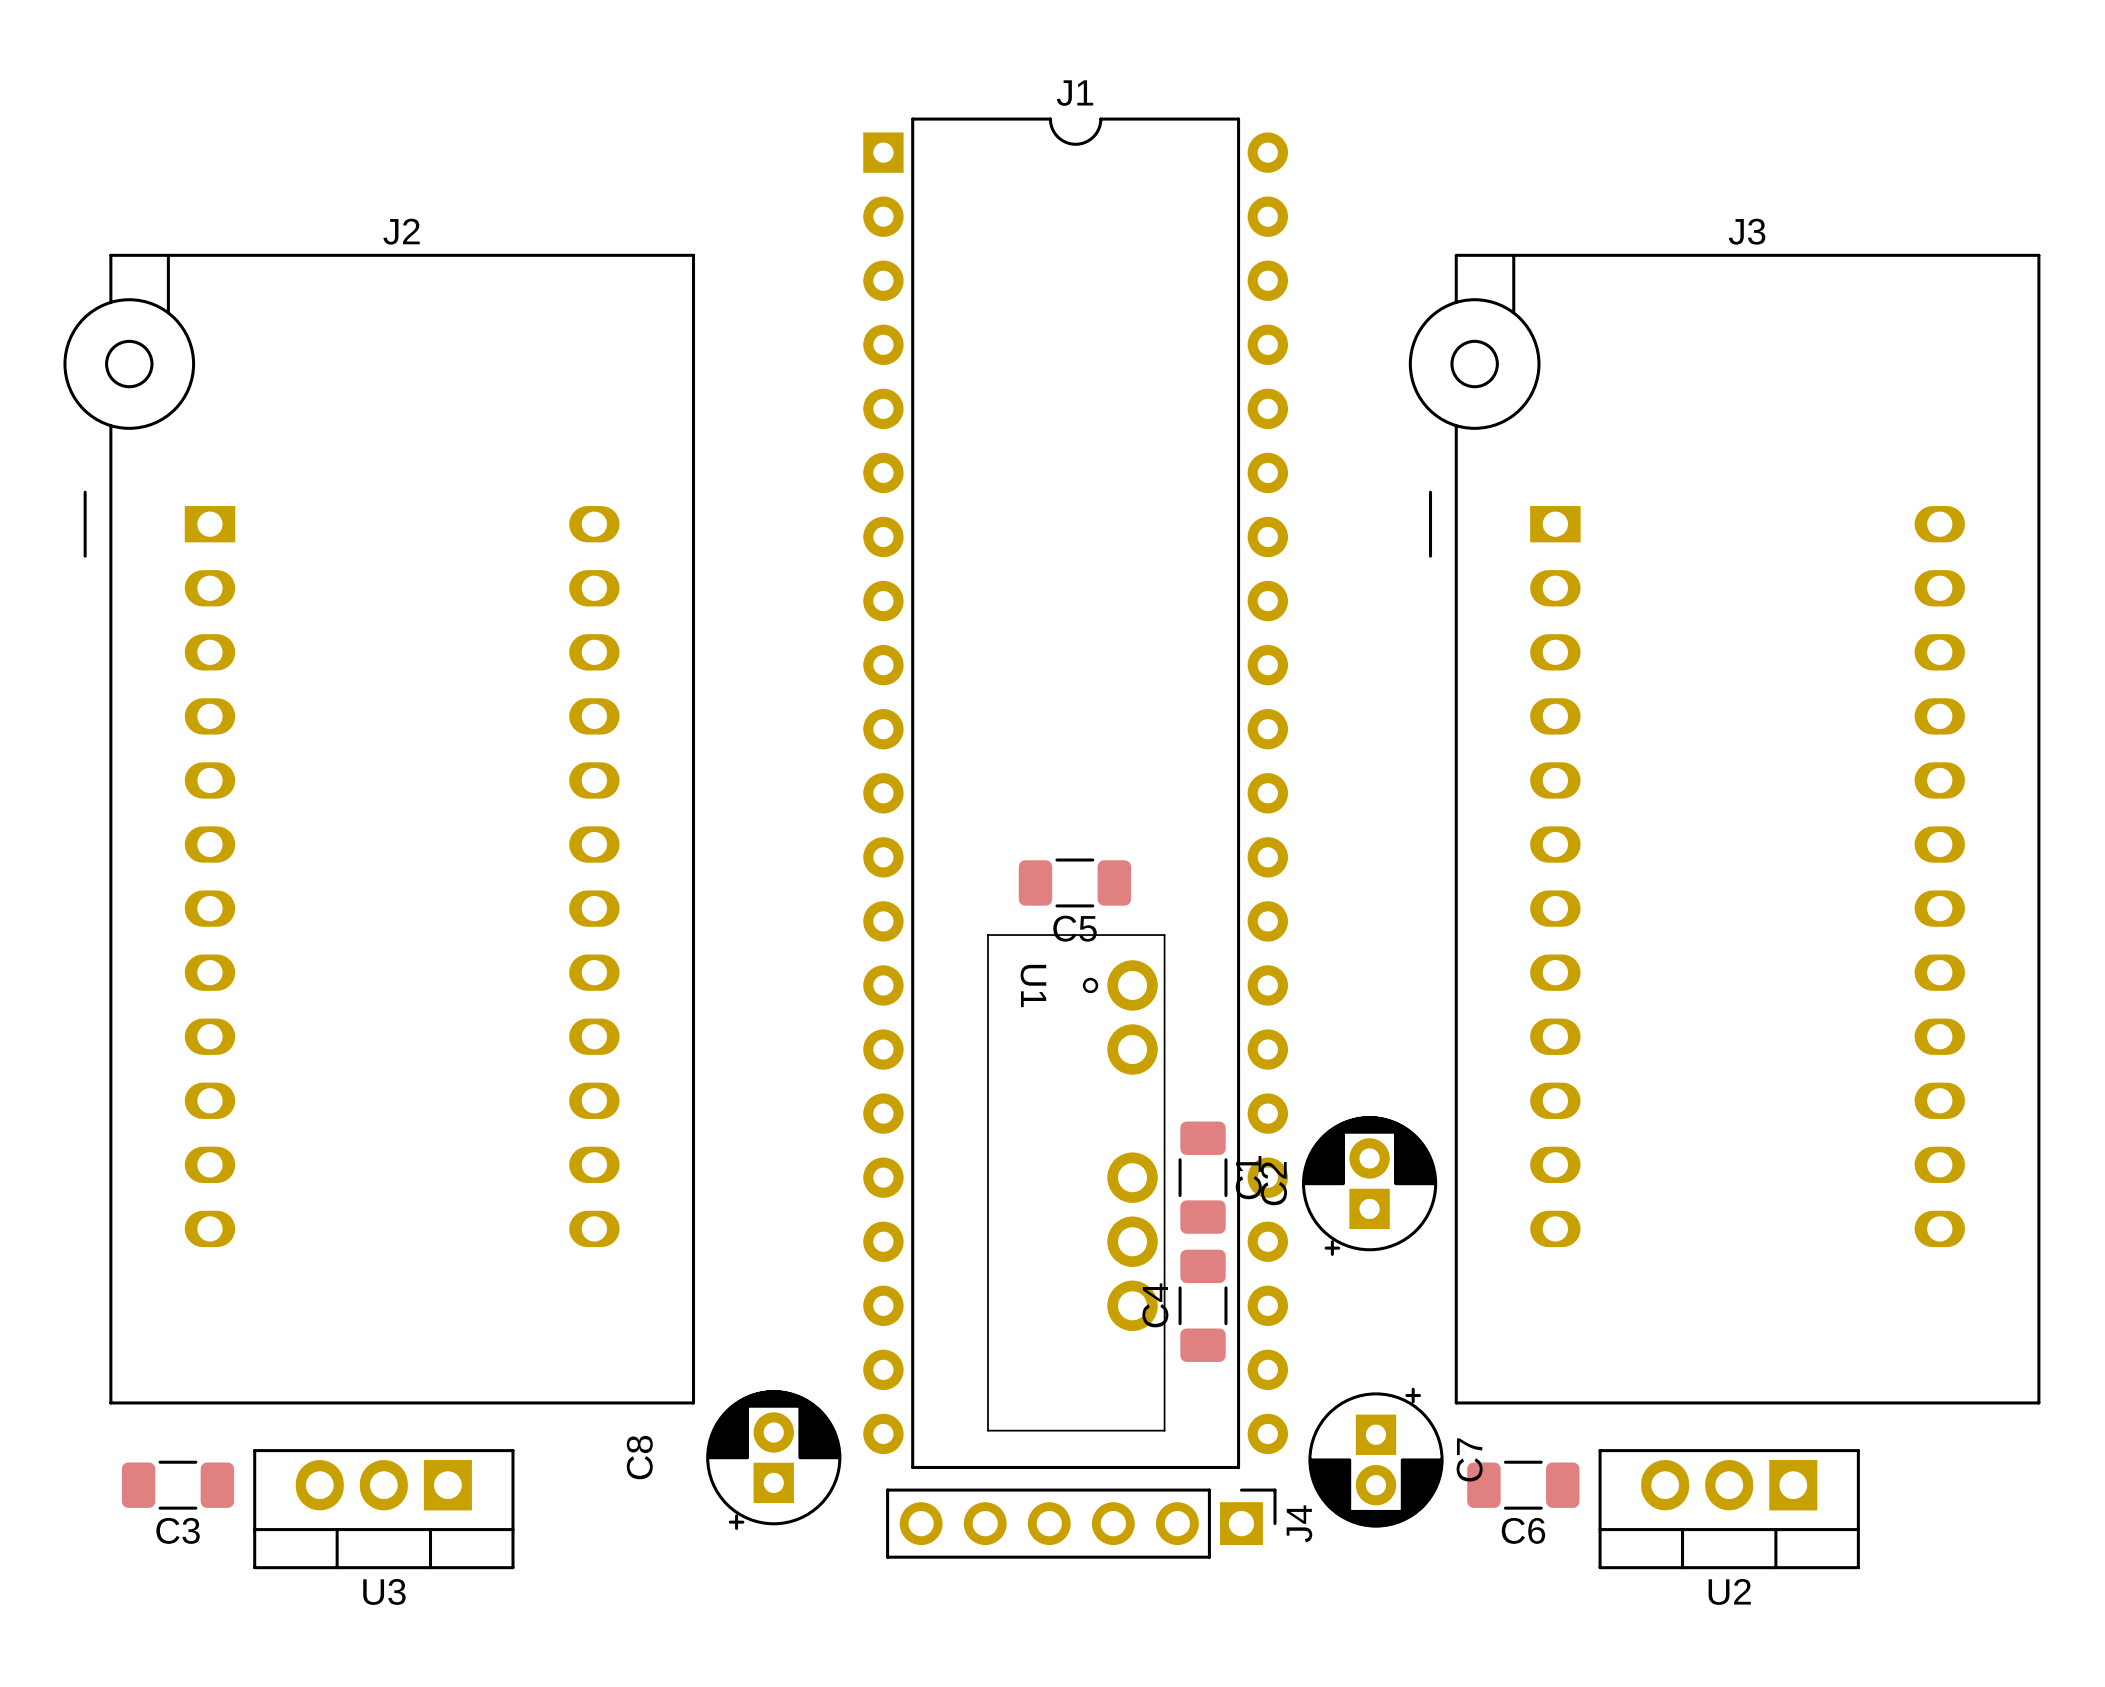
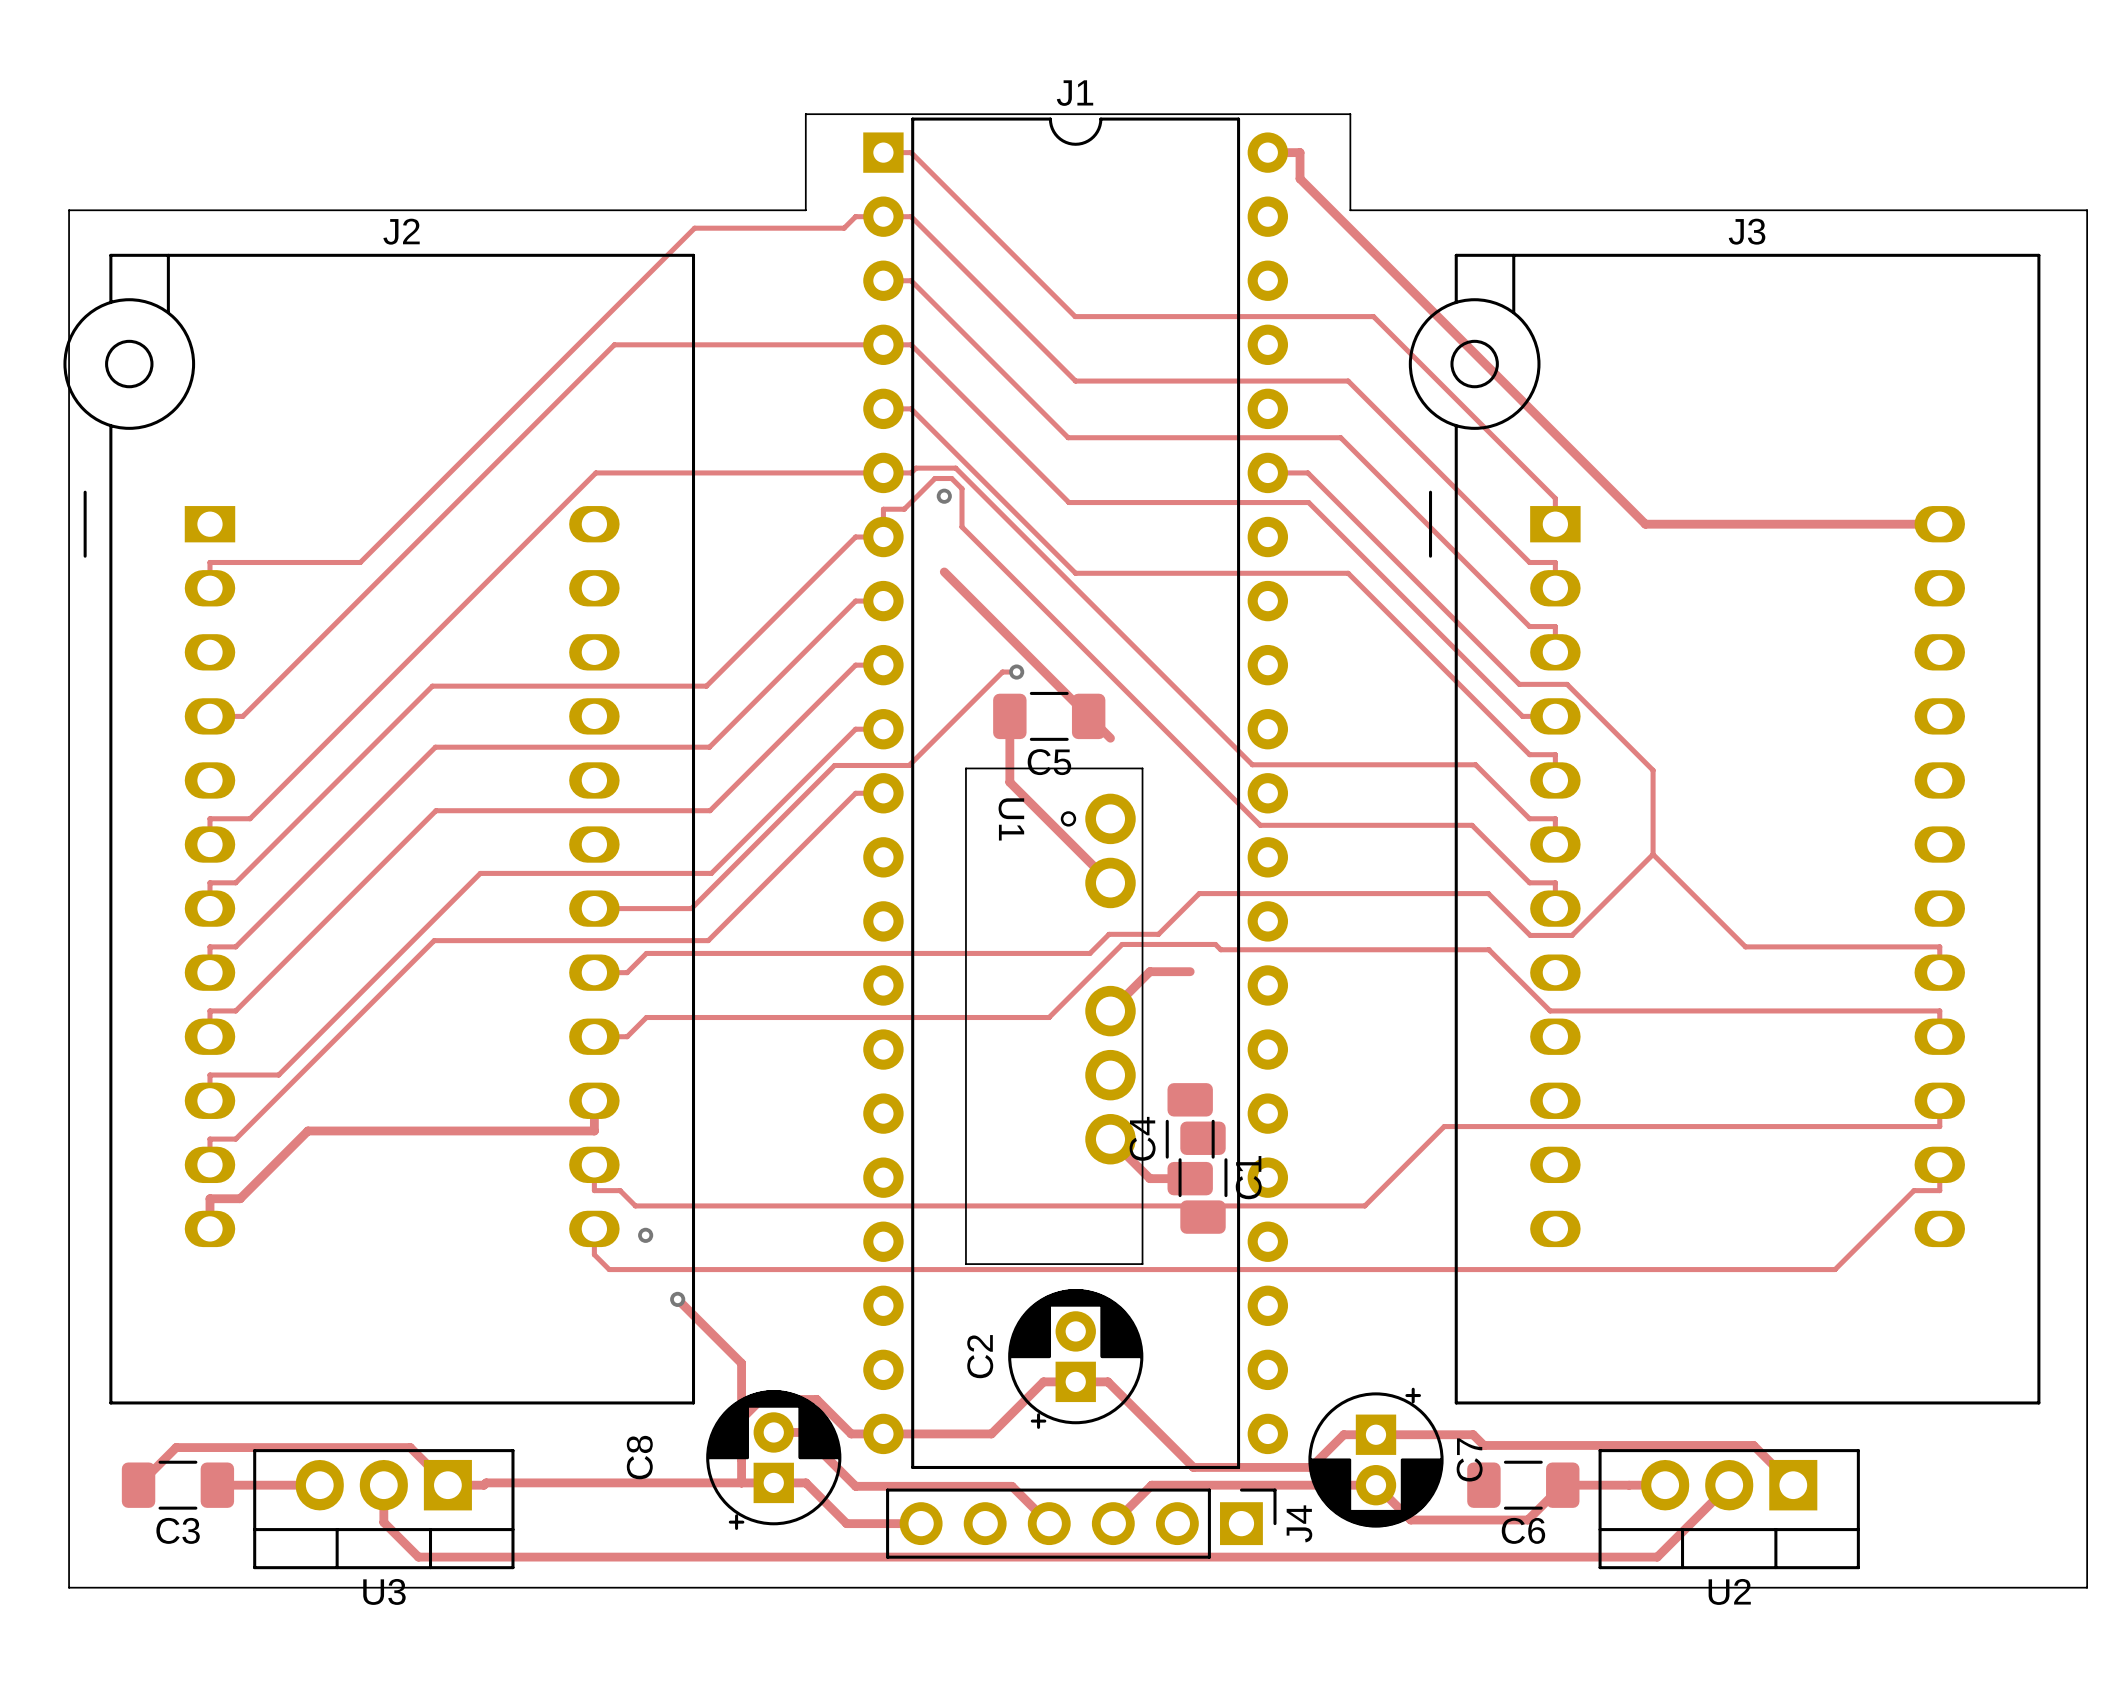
board edge: none -> (805, 114) (1350, 114) (1350, 210) (2087, 210) (2087, 1587) (69, 1587) (69, 210) (805, 210) (805, 114)
track: none -> (883, 152) (911, 152) (1075, 316) (1373, 316) (1555, 498) (1555, 524)
track: none -> (1267, 152) (1300, 152) (1300, 178) (1645, 524) (1939, 524)
track: none -> (883, 280) (911, 280) (1068, 437) (1340, 437) (1529, 626) (1555, 626) (1555, 652)
track: none -> (883, 408) (911, 408) (1075, 573) (1348, 573) (1529, 754) (1555, 754) (1555, 780)
track: none -> (1267, 472) (1307, 472) (1519, 684) (1567, 684) (1653, 770) (1653, 854)
via: none -> (944, 496)
track: none -> (944, 571) (1110, 738)
track: none -> (209, 588) (209, 562) (360, 562) (694, 228) (844, 228) (855, 216) (911, 216) (1075, 381) (1348, 381) (1529, 562) (1555, 562) (1555, 588)
track: none -> (883, 601) (855, 601) (709, 747) (435, 747) (235, 946) (209, 946) (209, 972)
track: none -> (883, 665) (855, 665) (710, 810) (436, 810) (235, 1010) (209, 1010) (209, 1036)
track: none -> (1016, 672) (1002, 672) (909, 765) (834, 765) (691, 908) (594, 908)
via: none -> (1016, 672)
track: none -> (209, 716) (242, 716) (614, 344) (911, 344) (1068, 502) (1308, 502) (1522, 716) (1555, 716)
track: none -> (1009, 716) (1009, 782) (1110, 882)
track: none -> (883, 729) (855, 729) (711, 873) (480, 873) (278, 1075) (209, 1075) (209, 1100)
track: none -> (883, 793) (855, 793) (708, 940) (434, 940) (235, 1139) (209, 1139) (209, 1164)
track: none -> (209, 844) (209, 818) (250, 818) (595, 472) (911, 472) (916, 468) (955, 468) (1252, 764) (1475, 764) (1529, 818) (1555, 818) (1555, 844)
track: none -> (1653, 854) (1745, 946) (1939, 946) (1939, 972)
track: none -> (1653, 854) (1572, 935) (1530, 935) (1488, 893) (1199, 893) (1158, 934) (1109, 934) (1089, 953) (646, 953) (627, 972) (594, 972)
C5 position: (1074, 882) -> (1049, 716)
track: none -> (209, 908) (209, 882) (235, 882) (432, 686) (706, 686) (855, 537) (883, 537) (883, 509) (904, 509) (934, 478) (951, 478) (962, 488) (962, 527) (1260, 825) (1472, 825) (1529, 882) (1555, 882) (1555, 908)
track: none -> (1190, 971) (1149, 971) (1110, 1011)
track: none -> (594, 1036) (627, 1036) (646, 1017) (1049, 1017) (1122, 944) (1215, 944) (1220, 949) (1488, 949) (1550, 1010) (1939, 1010) (1939, 1036)
track: none -> (594, 1100) (594, 1130) (307, 1130) (240, 1198) (209, 1198) (209, 1228)
track: none -> (1939, 1100) (1939, 1126) (1444, 1126) (1364, 1205) (635, 1205) (620, 1190) (594, 1190) (594, 1164)
track: none -> (1110, 1139) (1149, 1178) (1190, 1178)
track: none -> (1939, 1164) (1939, 1190) (1914, 1190) (1835, 1269) (609, 1269) (594, 1254) (594, 1228)
U1 position: (1076, 1182) -> (1054, 1016)
C2 position: (1369, 1186) -> (1075, 1358)
via: none -> (645, 1235)
track: none -> (677, 1299) (741, 1363) (741, 1482) (486, 1482) (483, 1485) (447, 1485) (410, 1447) (176, 1447) (138, 1485)
via: none -> (677, 1299)
C4 position: (1203, 1305) -> (1190, 1139)
track: none -> (741, 1419) (761, 1399) (816, 1399) (851, 1433) (991, 1433) (1043, 1381) (1107, 1381) (1193, 1467) (1311, 1467) (1343, 1434) (1473, 1434) (1483, 1445) (1753, 1445) (1793, 1485)
track: none -> (773, 1432) (801, 1432) (855, 1486) (1011, 1486) (1049, 1523)
track: none -> (741, 1482) (805, 1482) (846, 1523) (921, 1523)
track: none -> (217, 1485) (319, 1485)
track: none -> (383, 1485) (383, 1522) (418, 1557) (1657, 1557) (1729, 1485)
track: none -> (1665, 1485) (1562, 1485) (1527, 1520) (1410, 1520) (1375, 1485) (1151, 1485) (1113, 1523)

